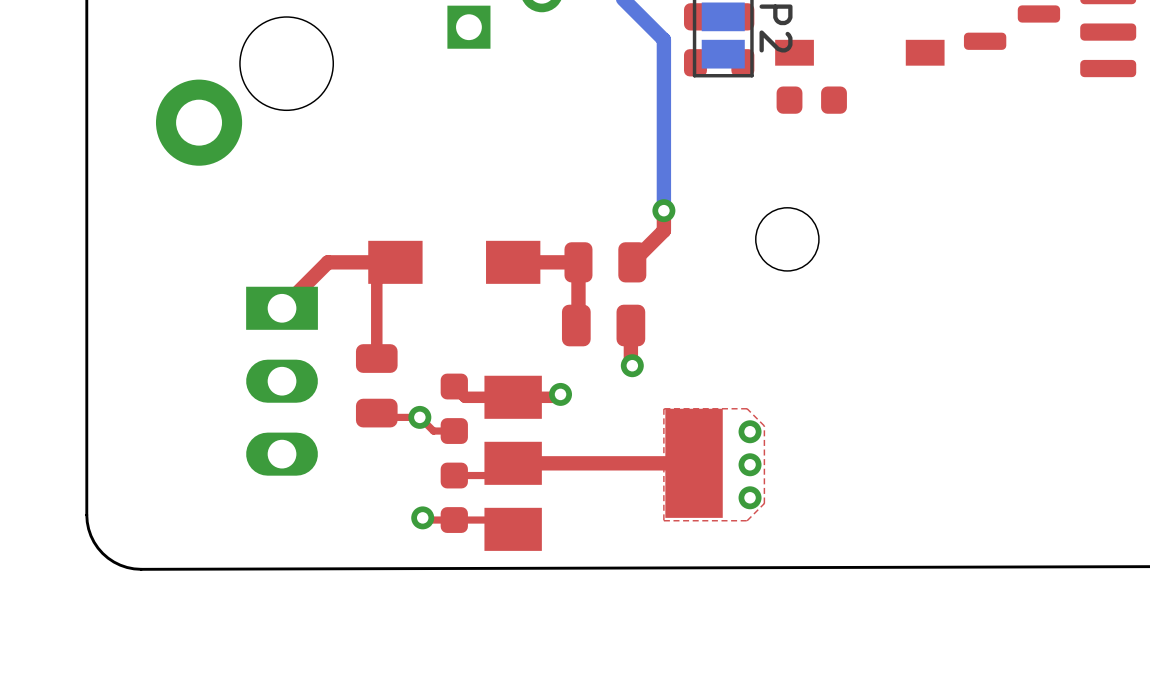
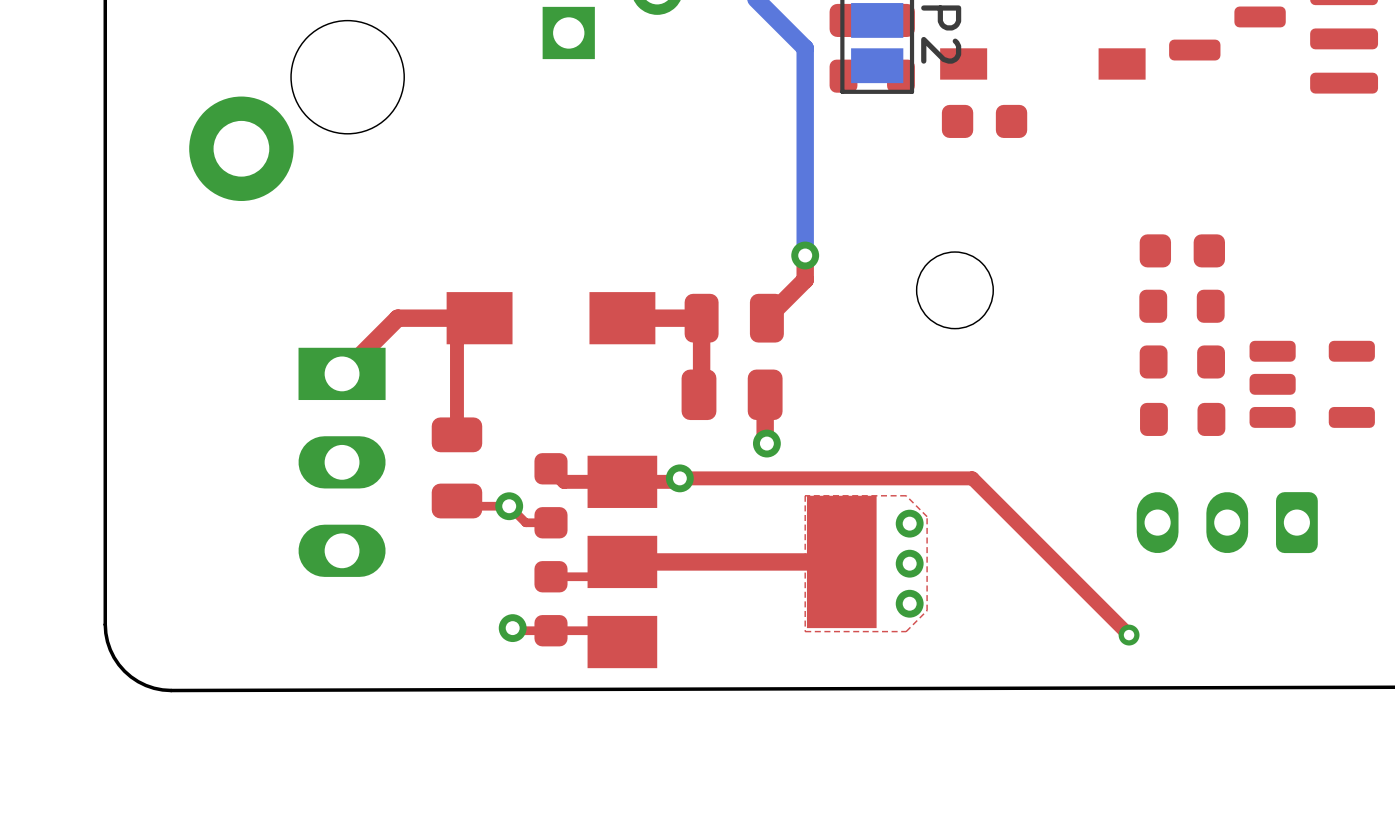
part: none -> (1182, 250)
part: none -> (1181, 306)
part: none -> (1182, 361)
part: none -> (1312, 384)
part: none -> (1182, 419)
top track: none -> (679, 478) (972, 478) (1129, 635)
part: none -> (1227, 522)
via: none -> (1129, 635)

